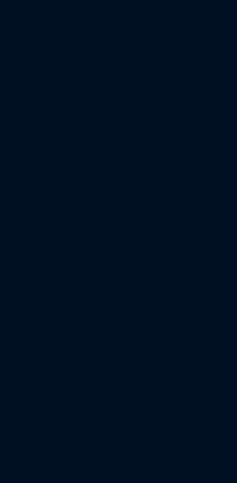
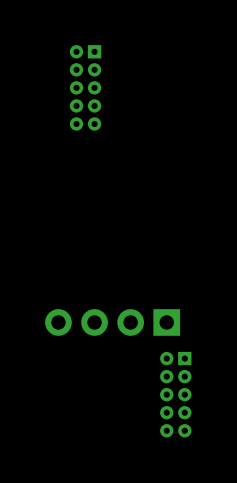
part: none -> (85, 87)
part: none -> (112, 322)
part: none -> (175, 394)

